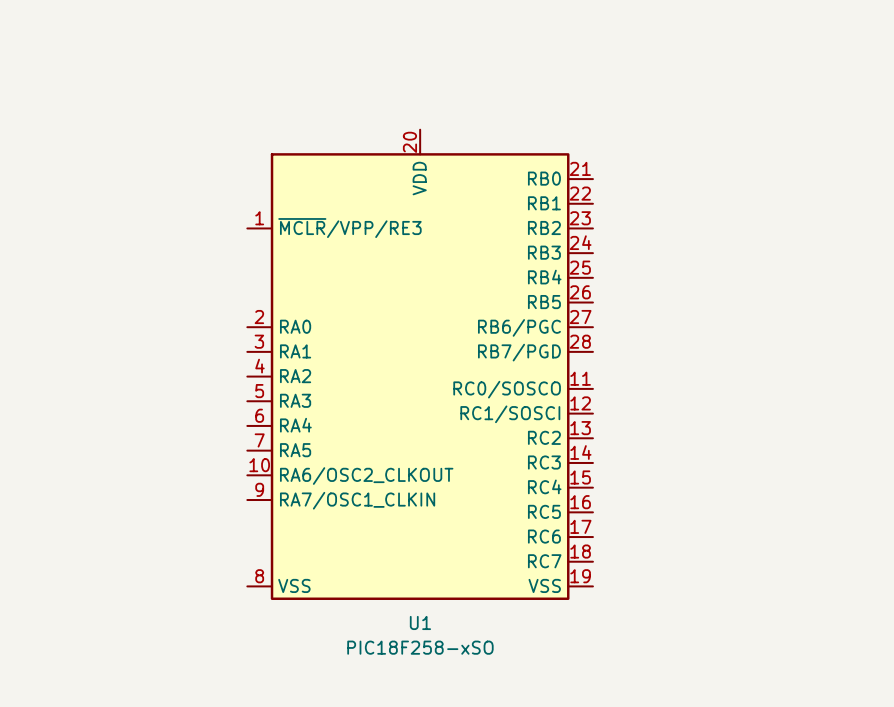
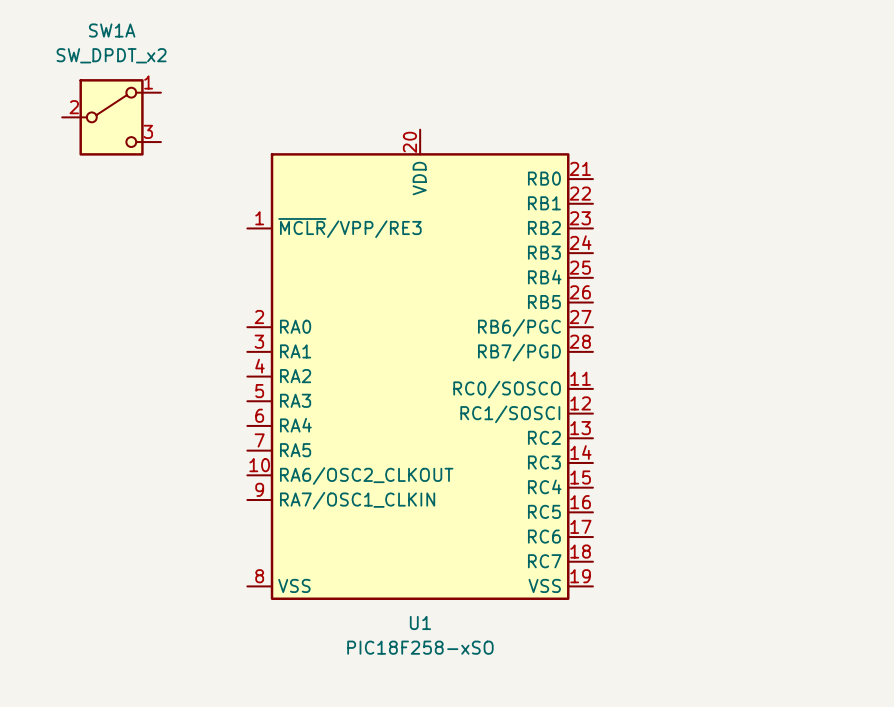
SW1A: none -> SW_DPDT_x2 (111, 117)

